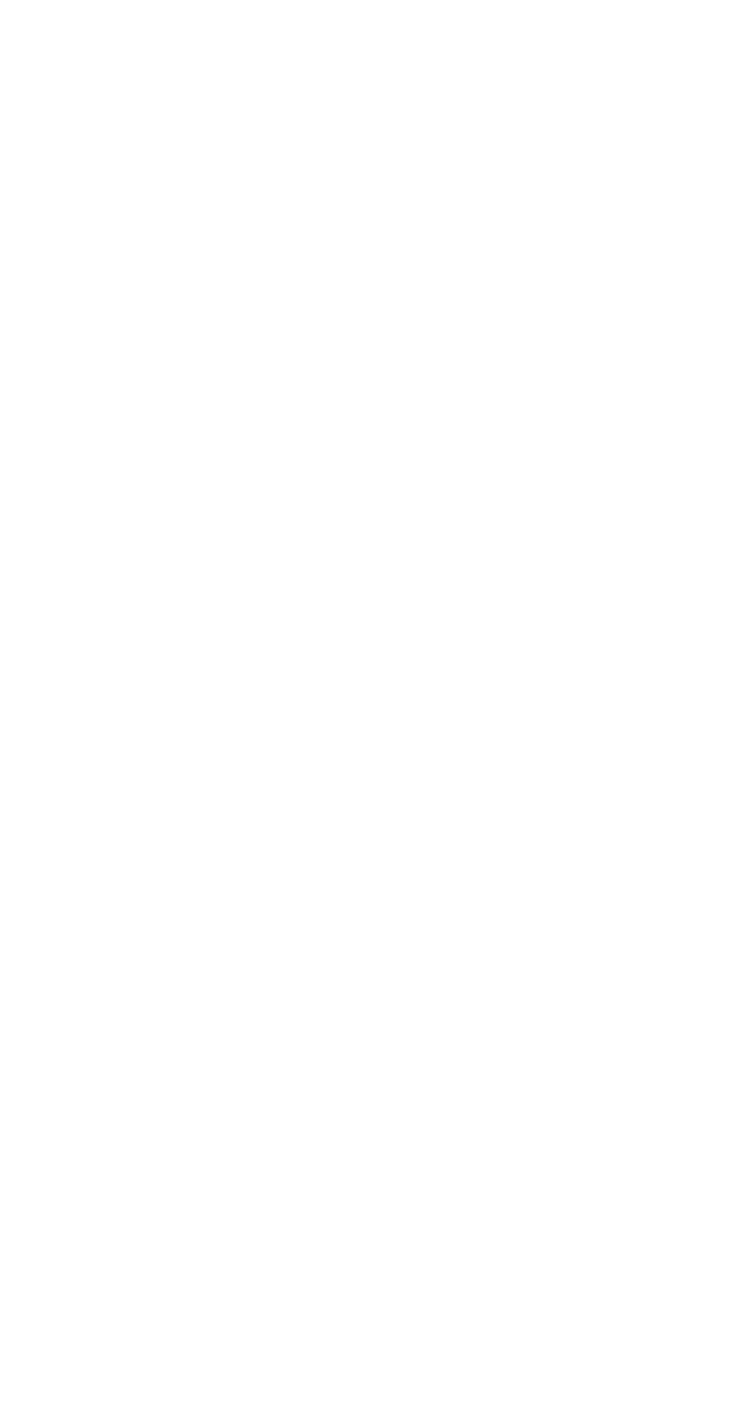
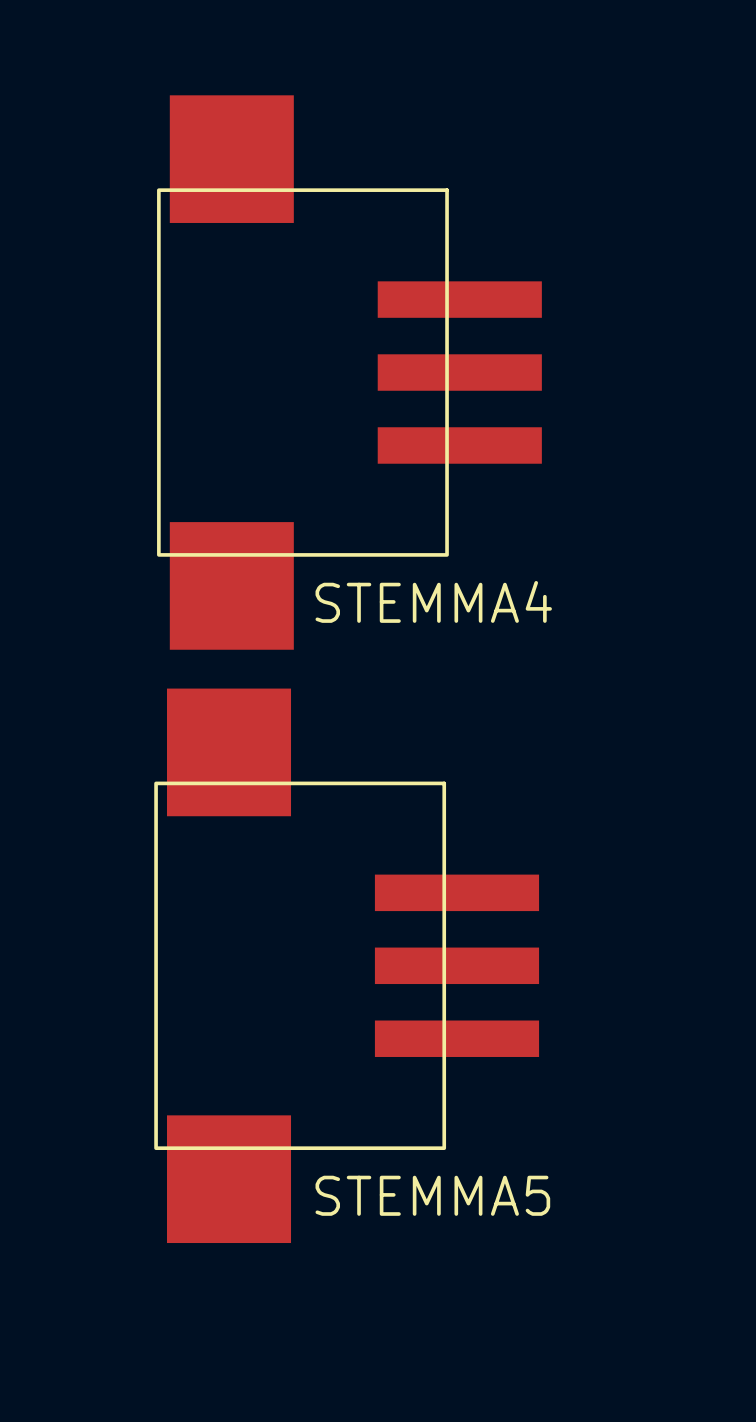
STEMMA4: none -> (349, 372)
STEMMA5: none -> (346, 965)

